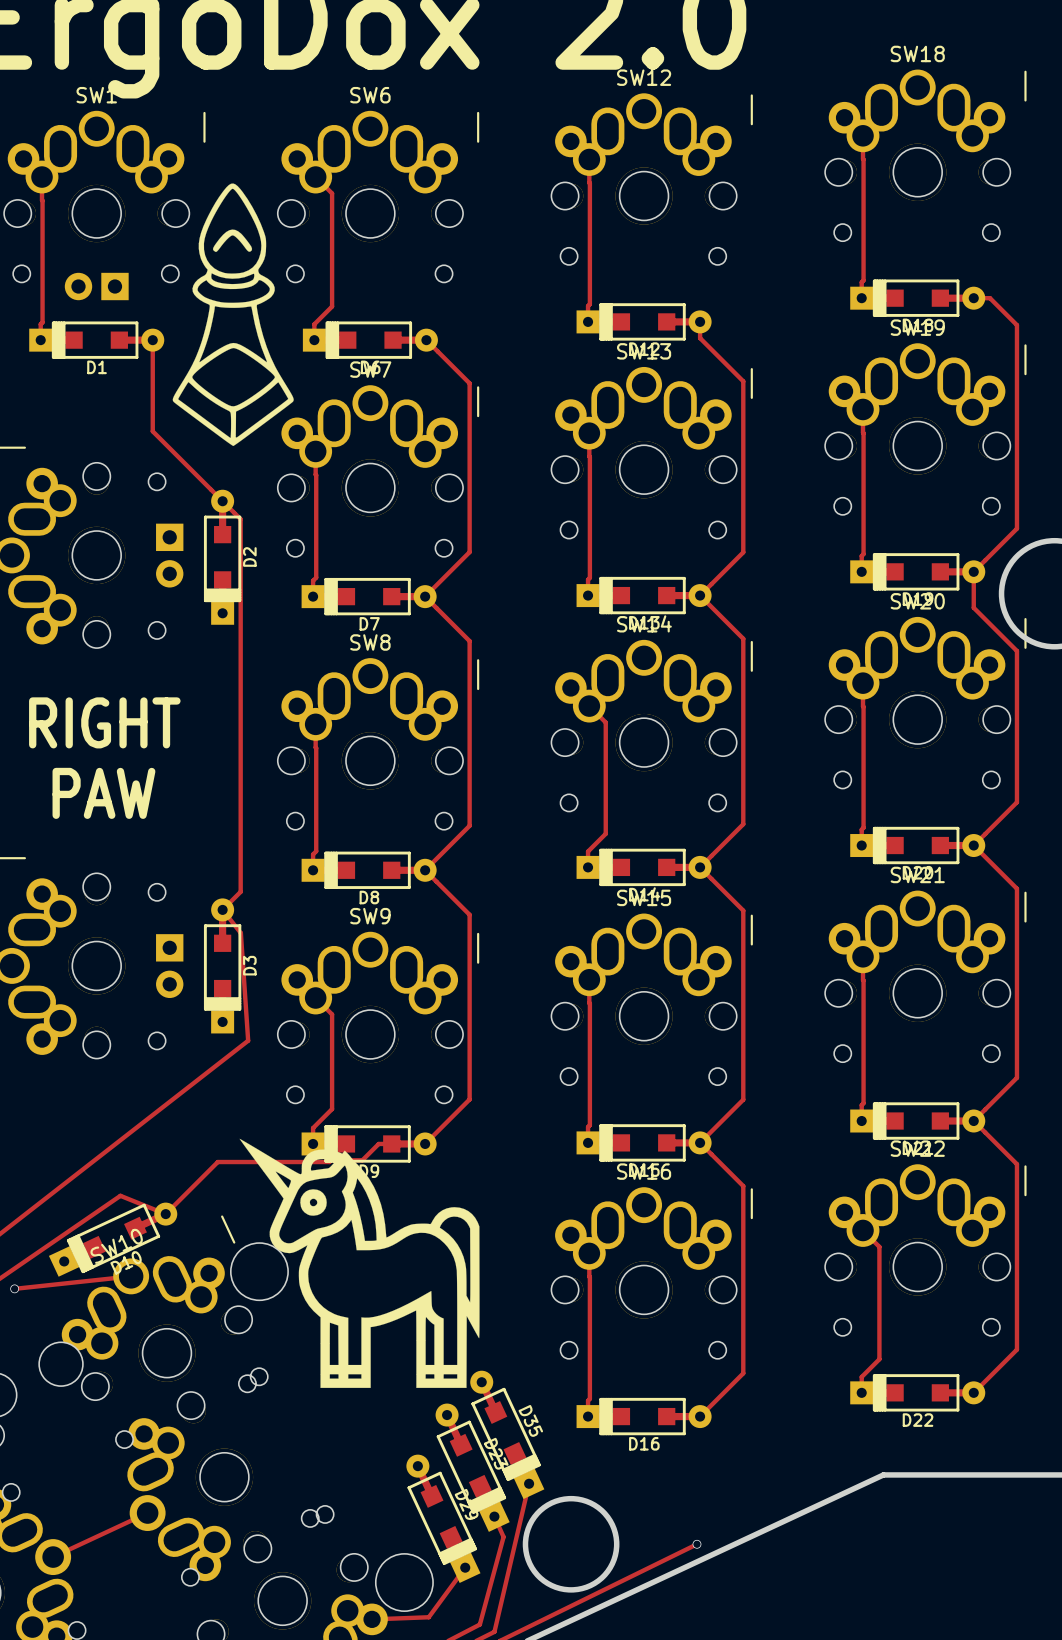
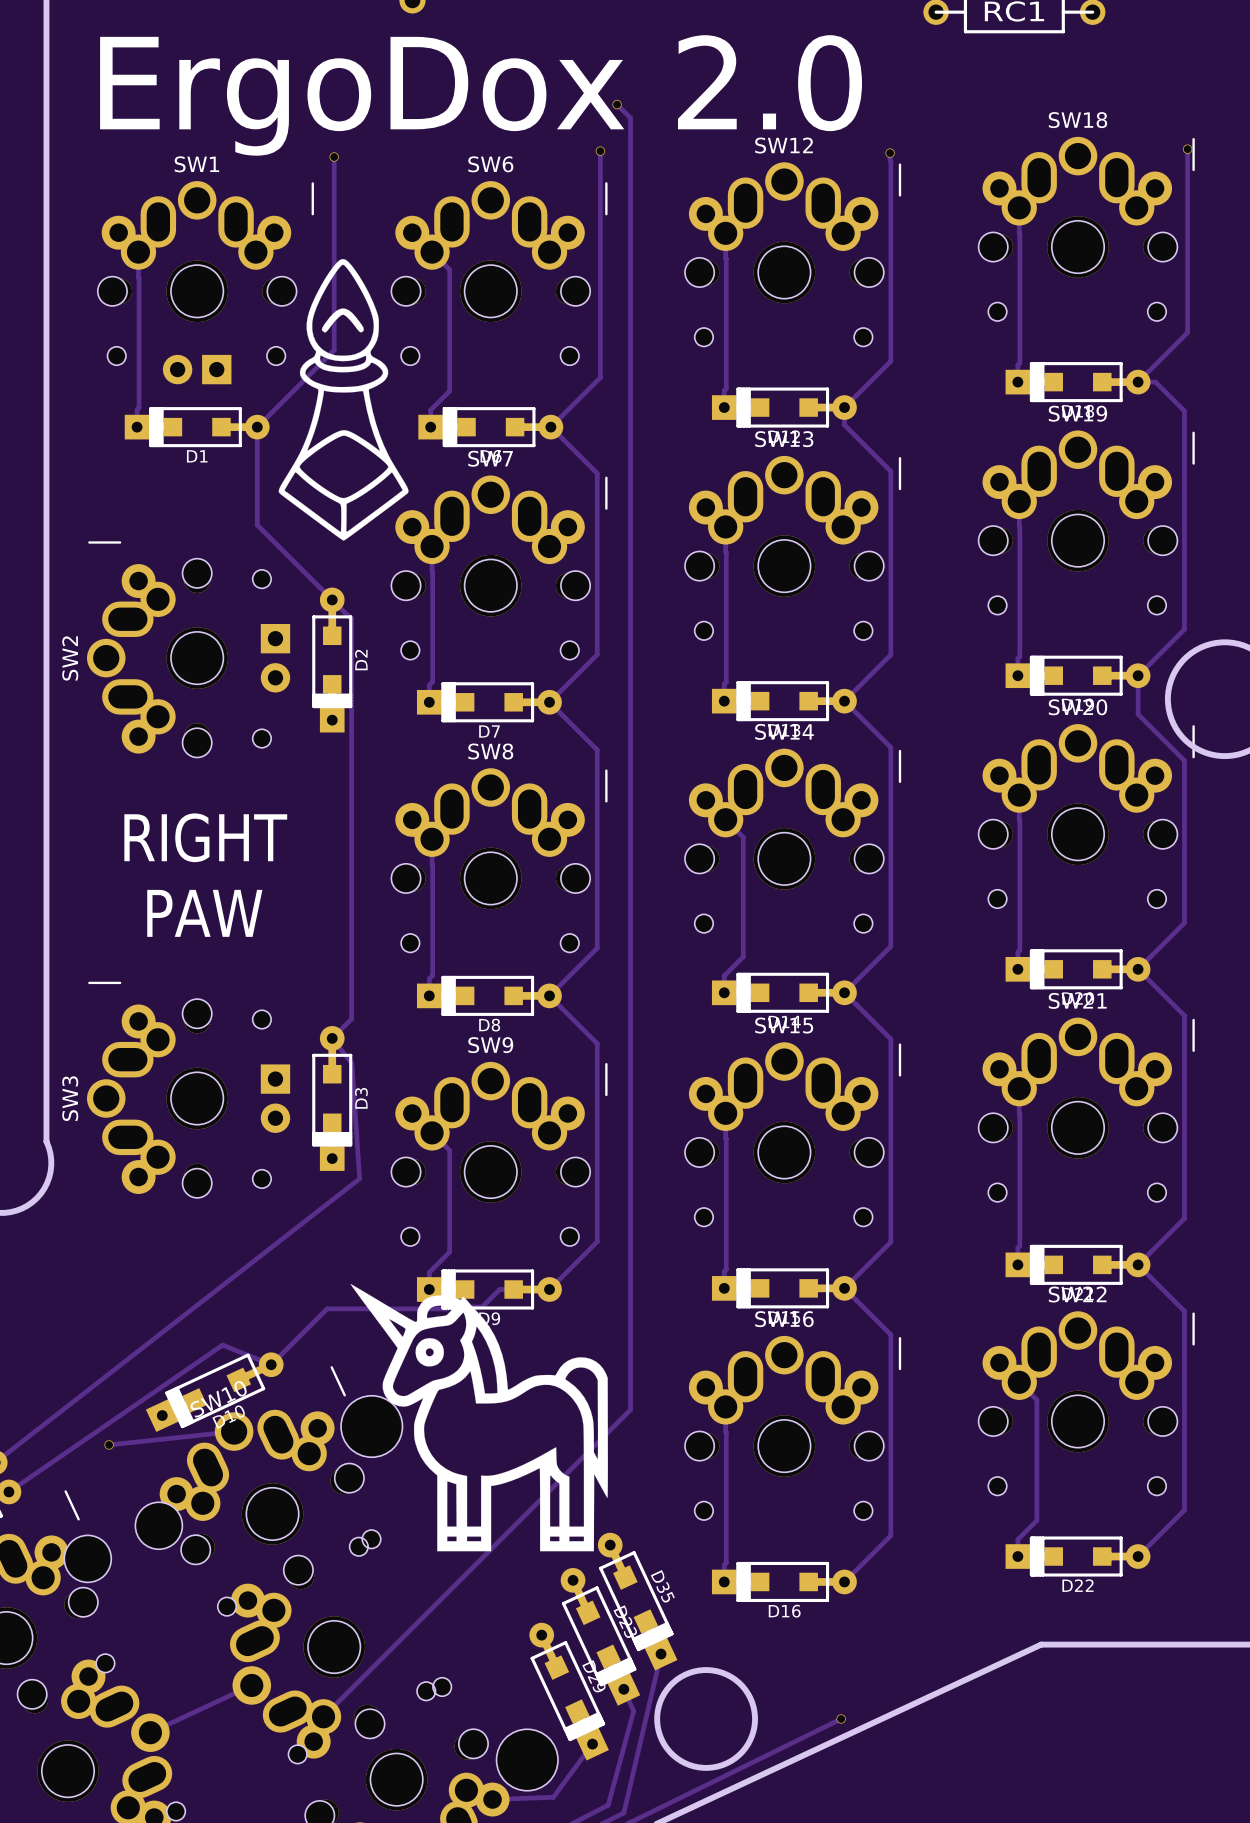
track: none -> (617, 104) (630, 118) (630, 1409) (323, 1716)
via: none -> (617, 104)
track: none -> (1187, 149) (1187, 332) (1138, 382)
via: none -> (1187, 149)
track: none -> (600, 151) (600, 377) (550, 427)
via: none -> (600, 151)
track: none -> (890, 153) (890, 361) (844, 407)
via: none -> (890, 153)
track: none -> (334, 157) (334, 350) (257, 427)
via: none -> (334, 157)

